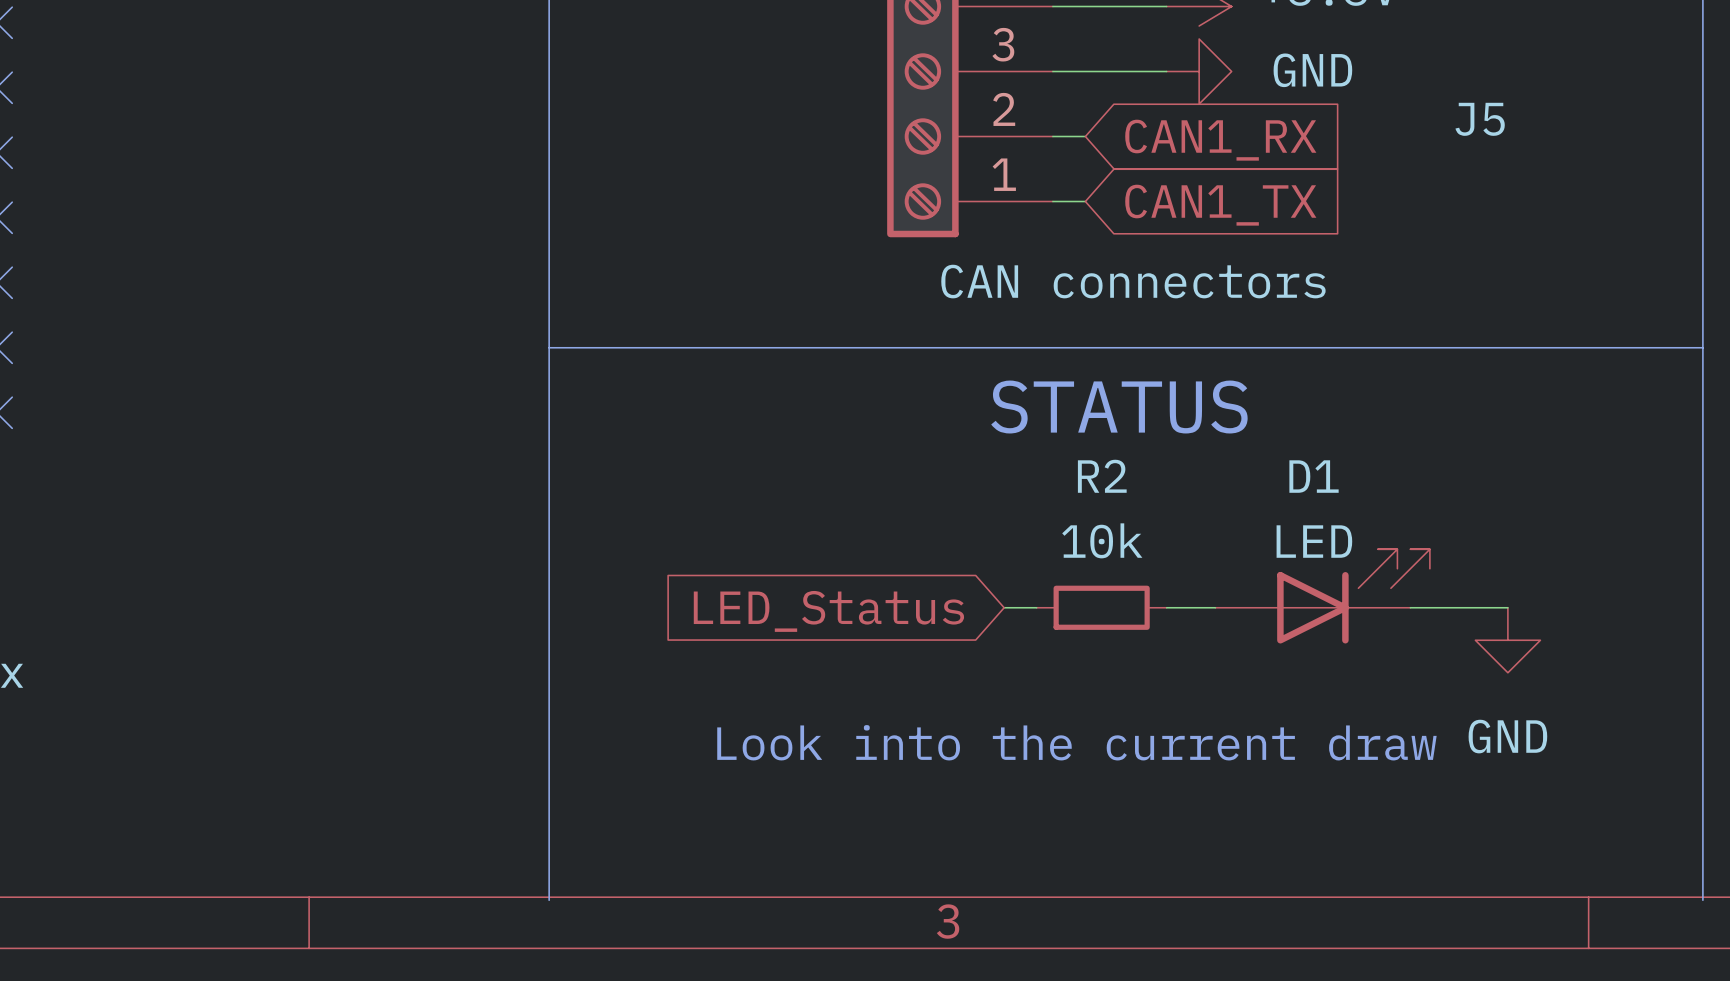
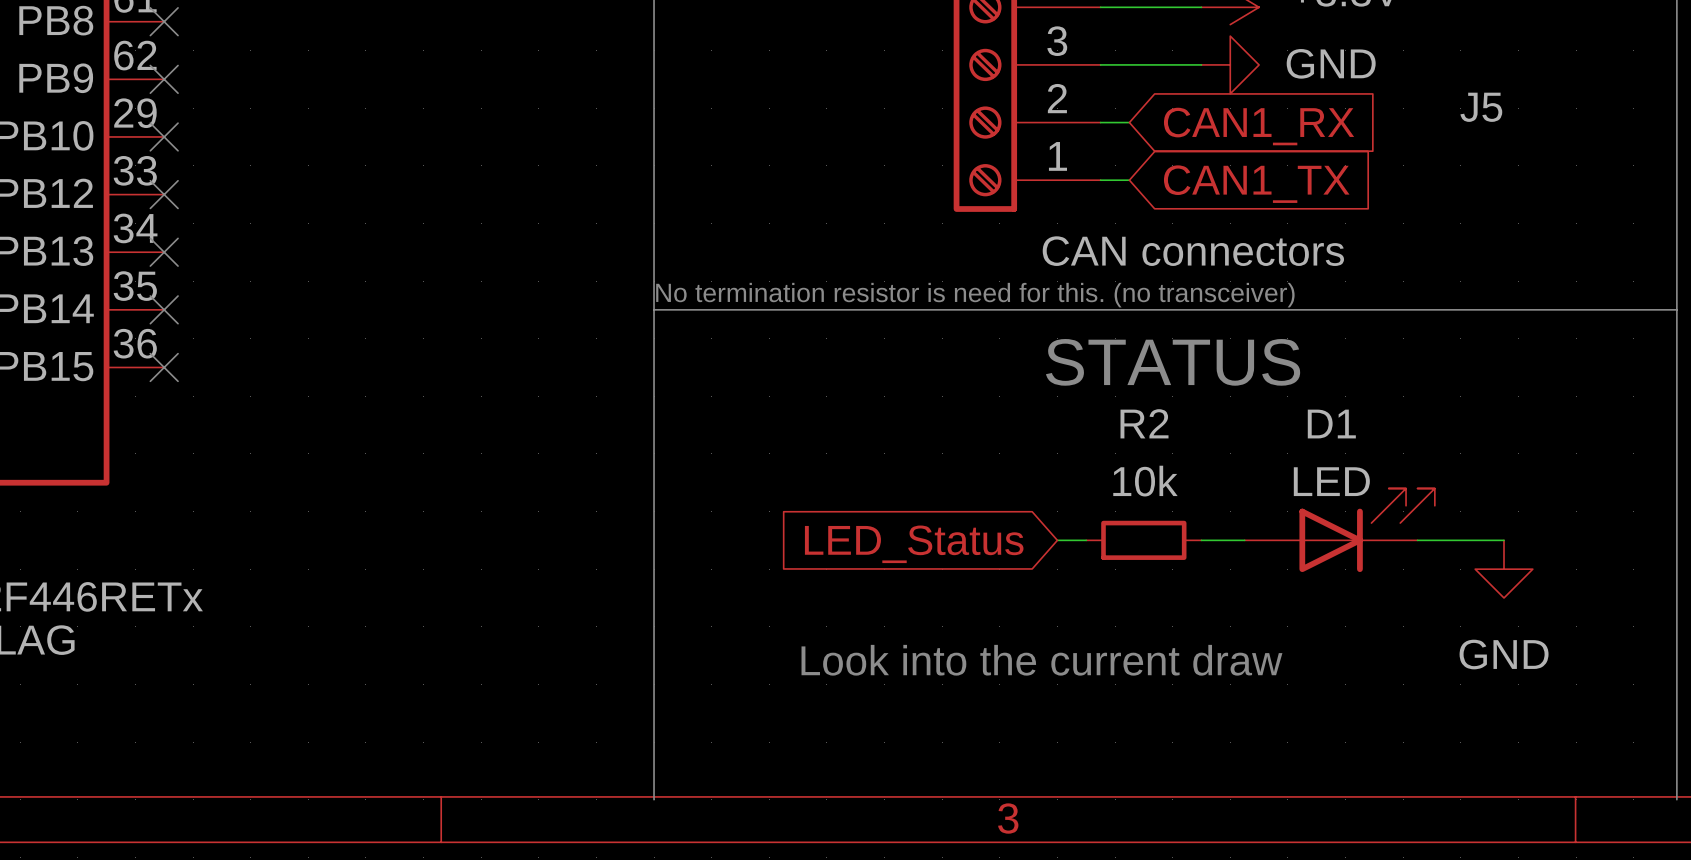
text: none -> No termination resistor is need for this. (no transceiver) (975, 295)

